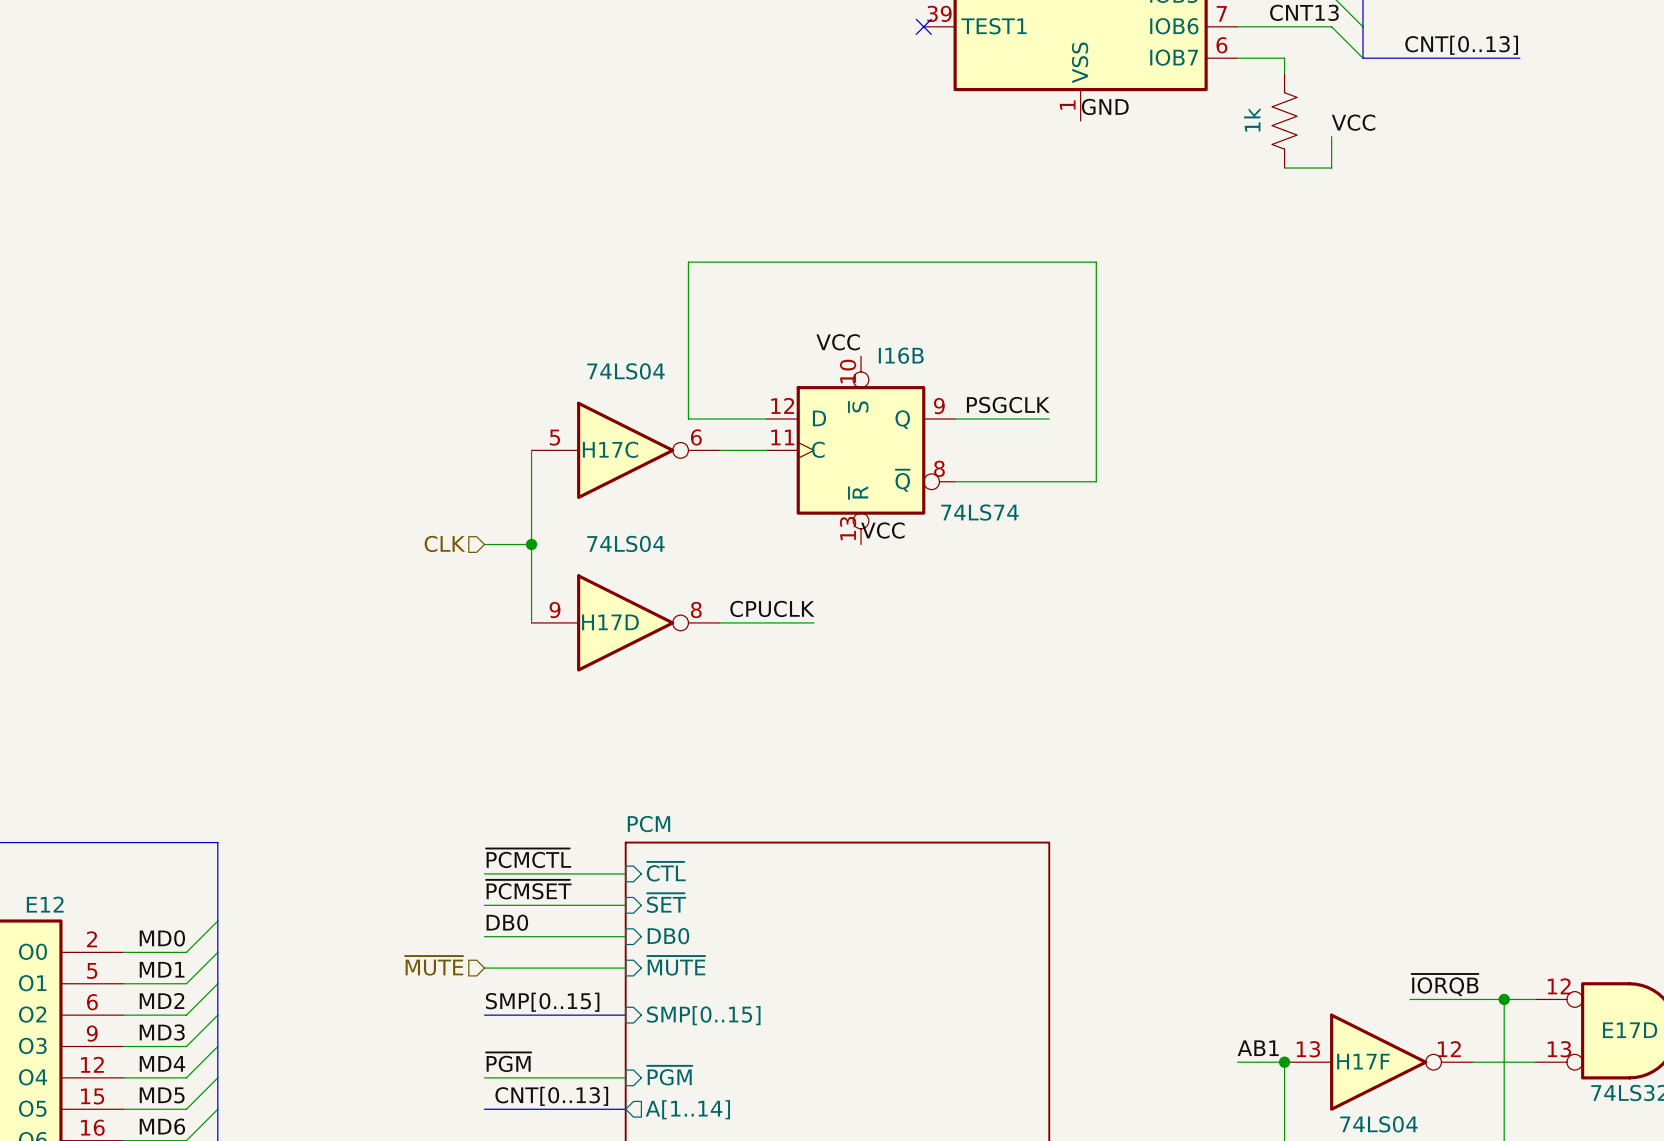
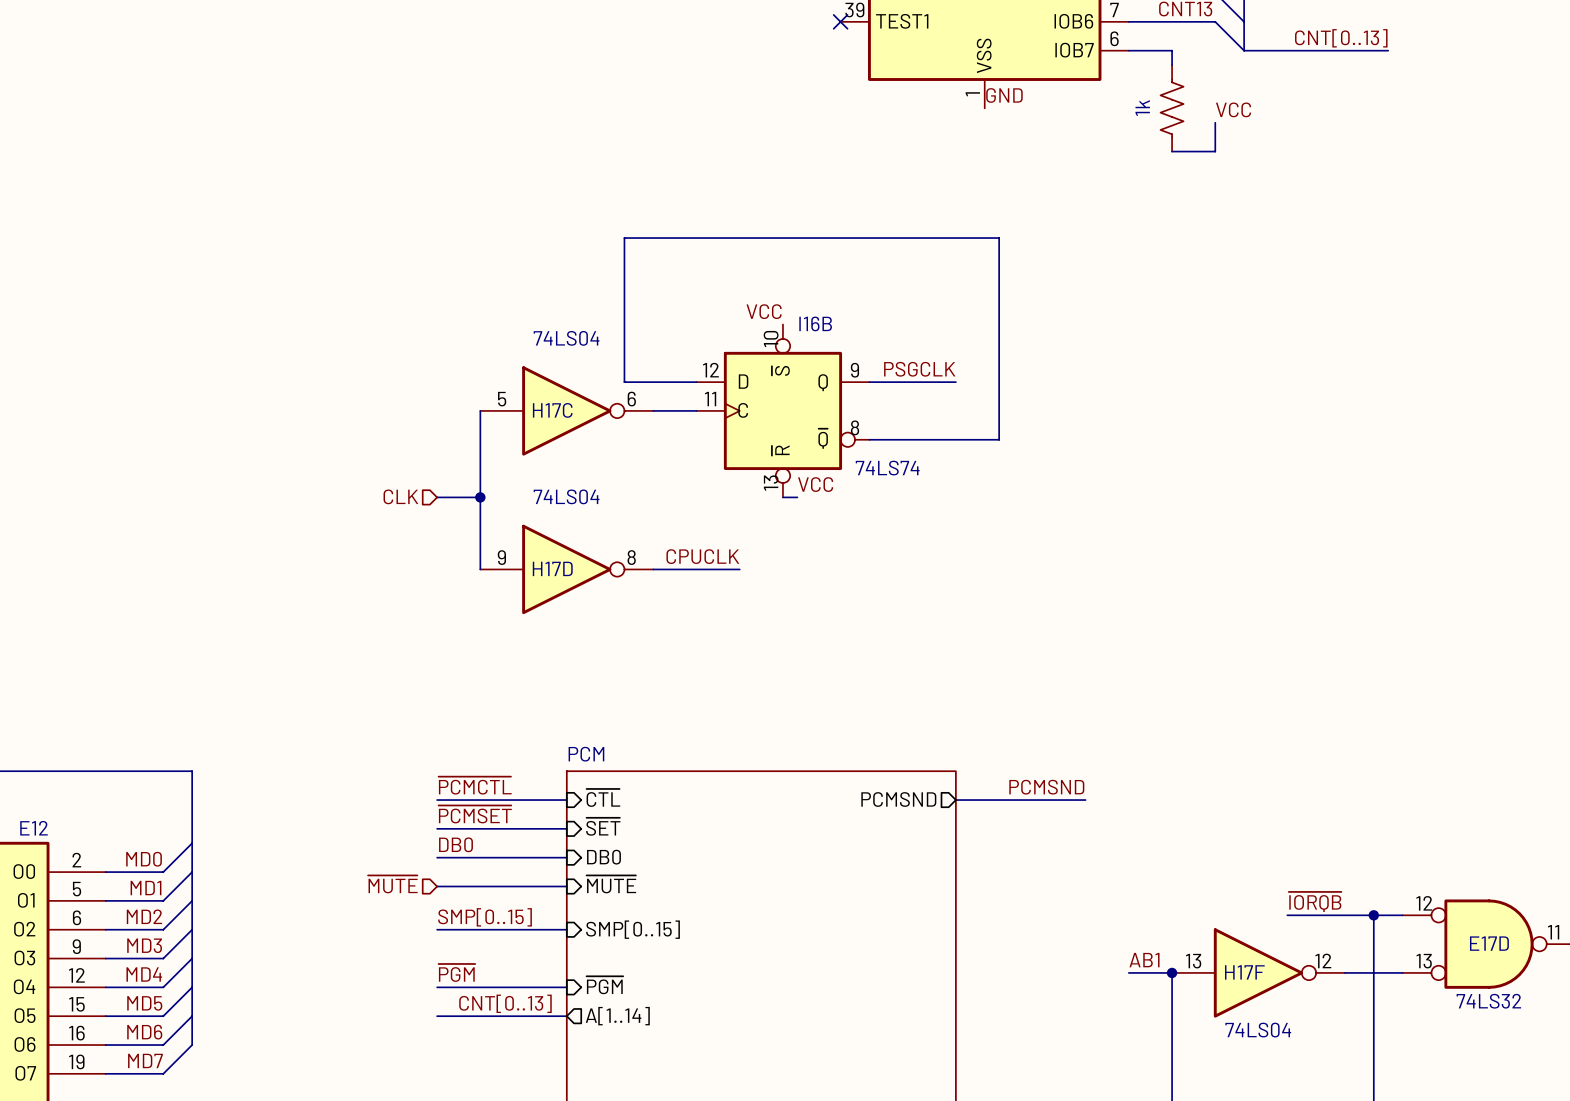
label position: VCC (882, 530) -> VCC (815, 484)
wire: none -> (782, 497) (797, 497)
label: none -> PCMSND (1046, 787)
sheet pin: none -> PCMSND (898, 799)
wire: none -> (955, 800) (1085, 800)

